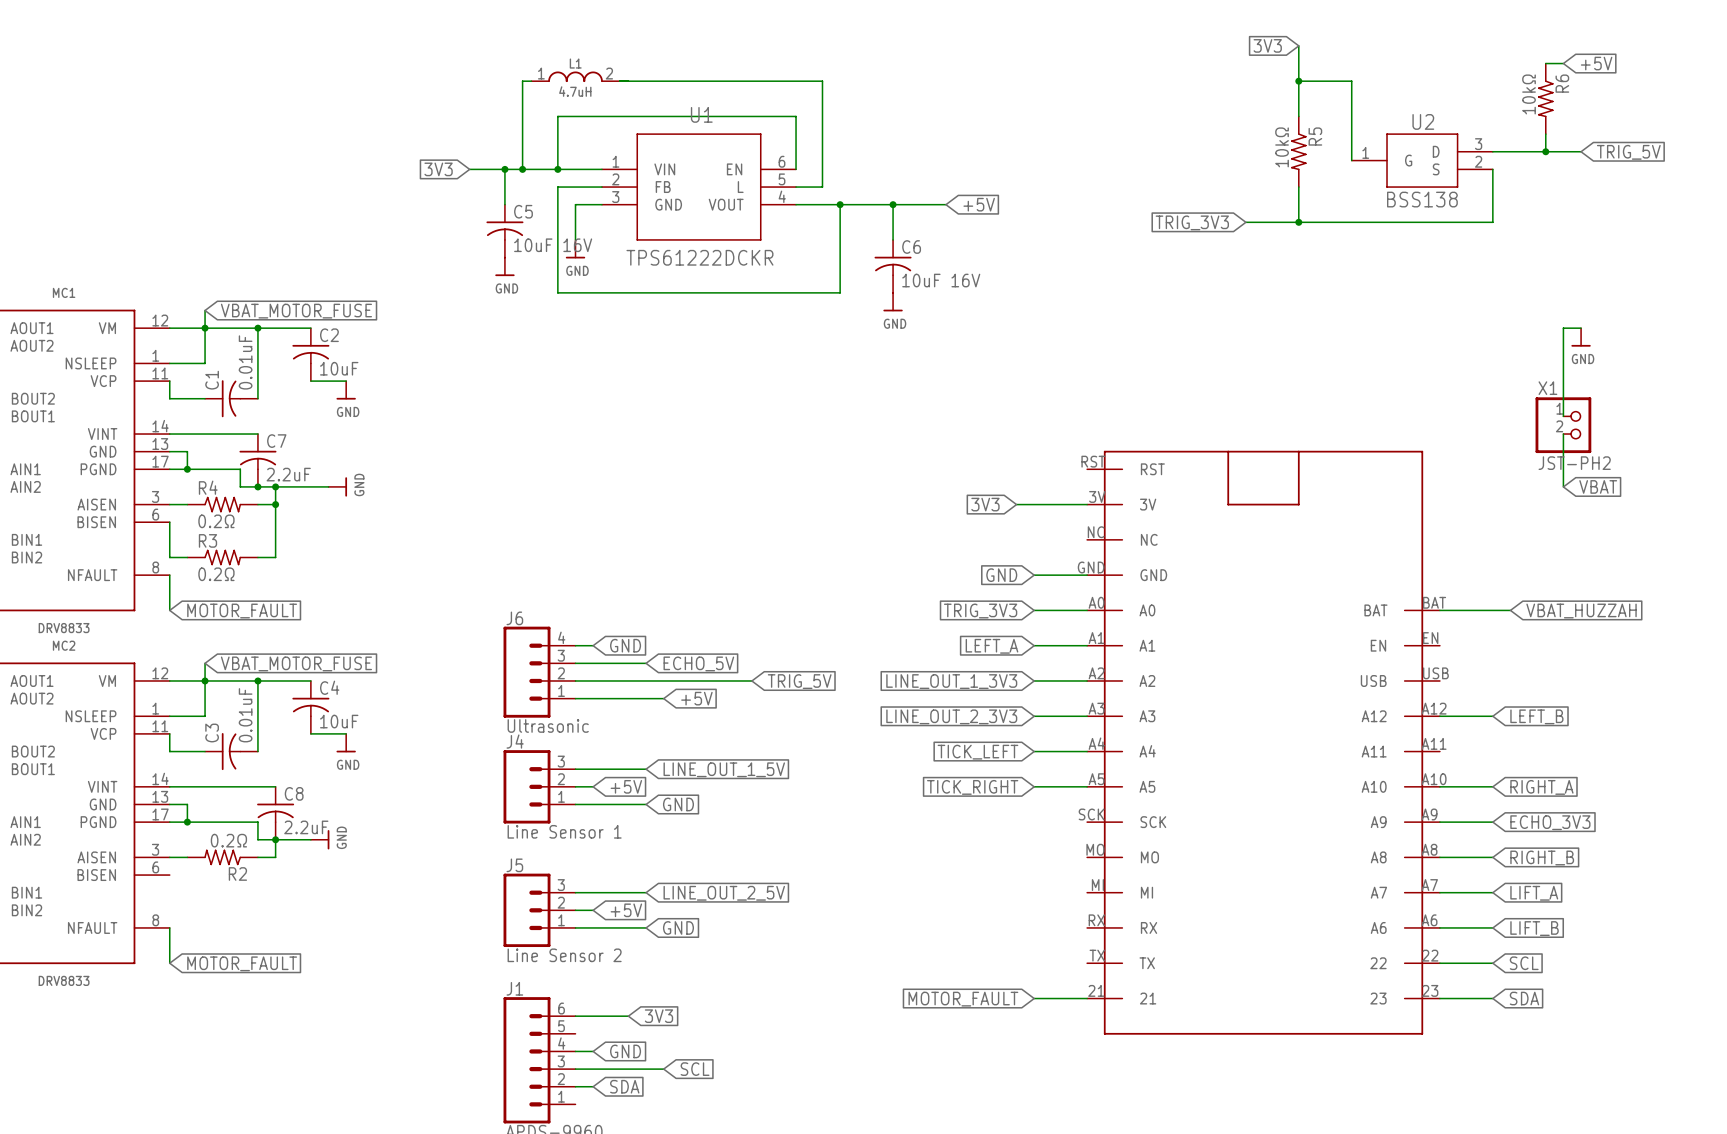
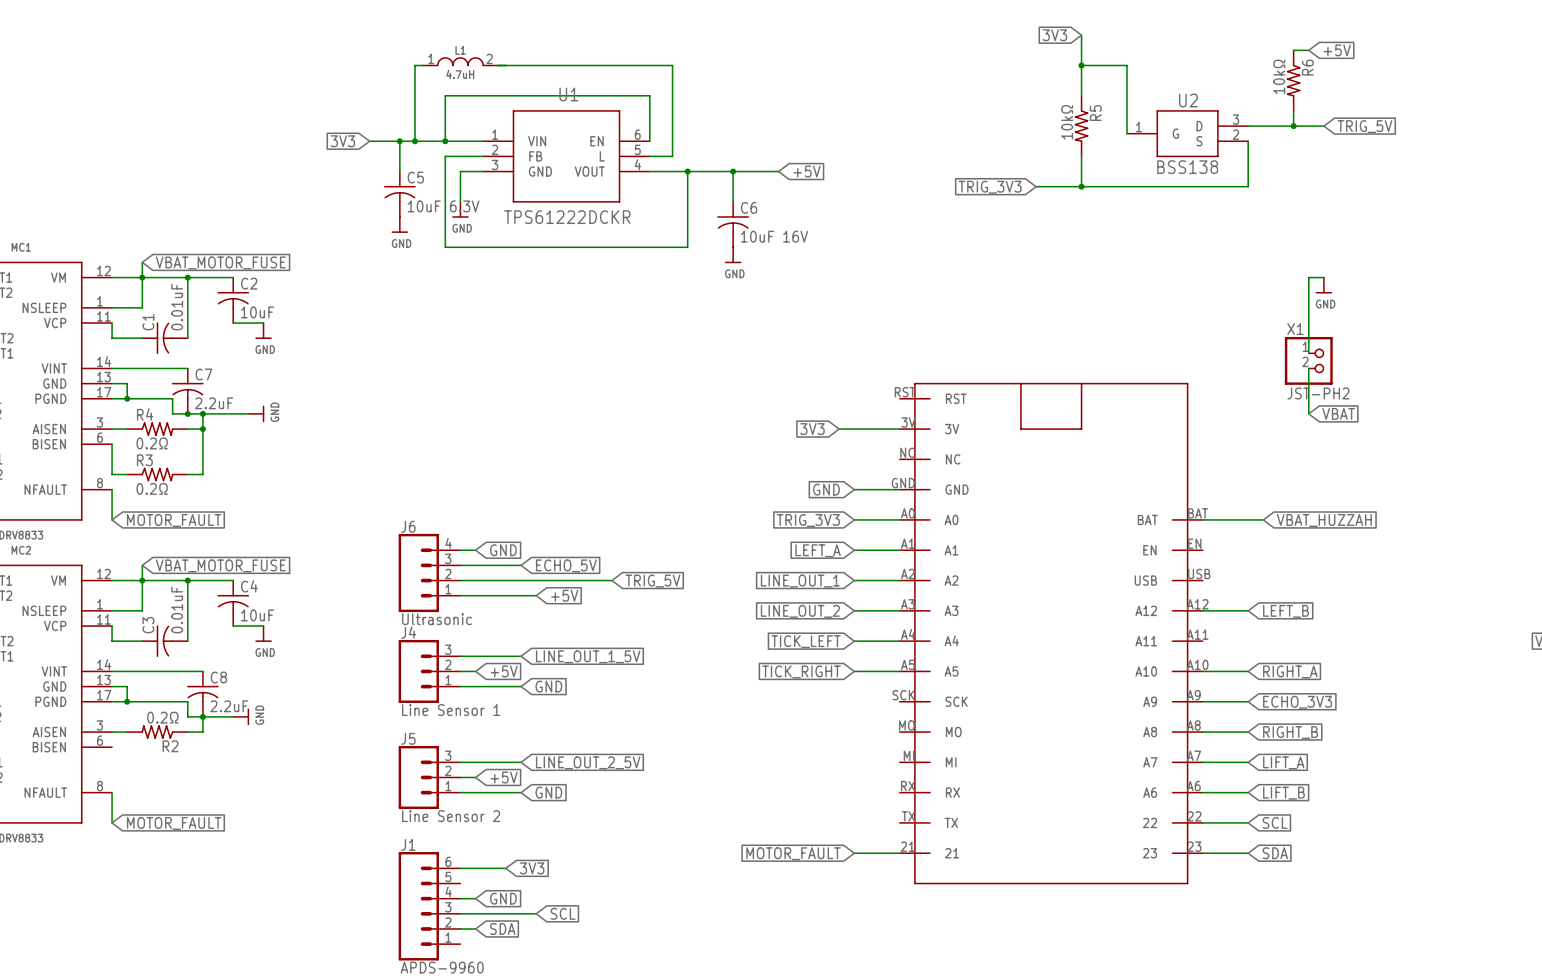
C5 value: 10uF 16V (553, 245) -> 10uF 6.3V (443, 206)
global label: LINE_OUT_1_3V3 (951, 681) -> LINE_OUT_1 (800, 581)
global label: LINE_OUT_2_3V3 (951, 716) -> LINE_OUT_2 (800, 611)

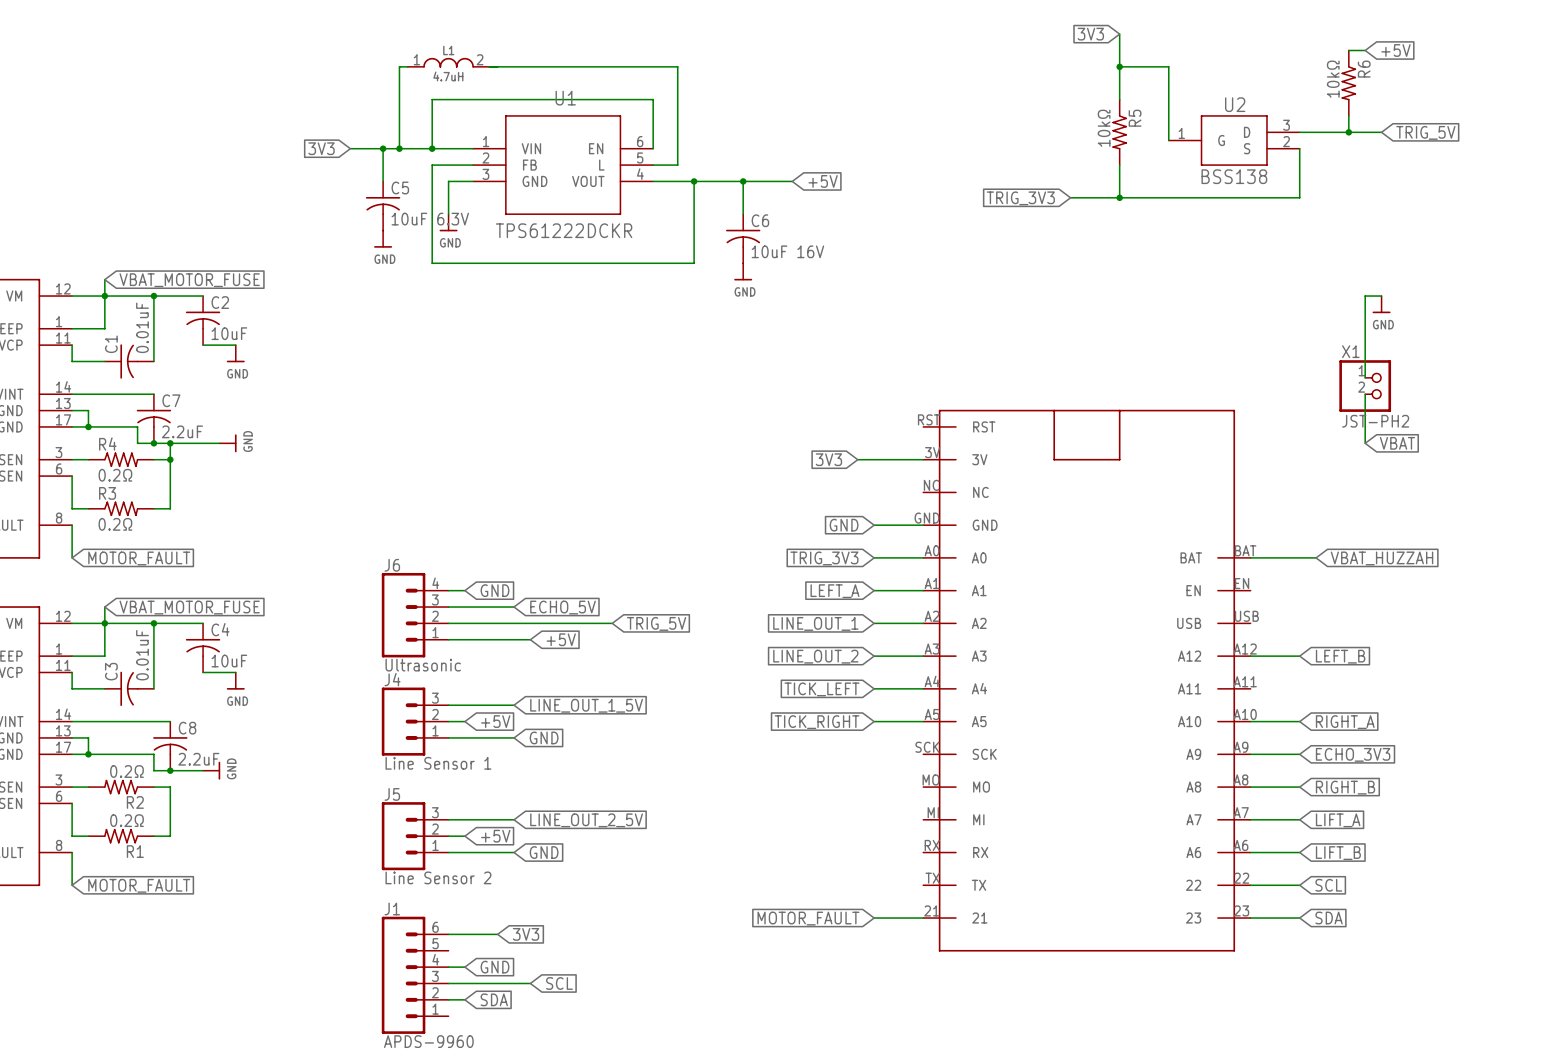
wire: (202, 716) (202, 732) -> (153, 836) (170, 836) (170, 787)
wire: none -> (72, 803) (72, 836) (88, 836)
R1: none -> 0.2Ω (121, 836)

